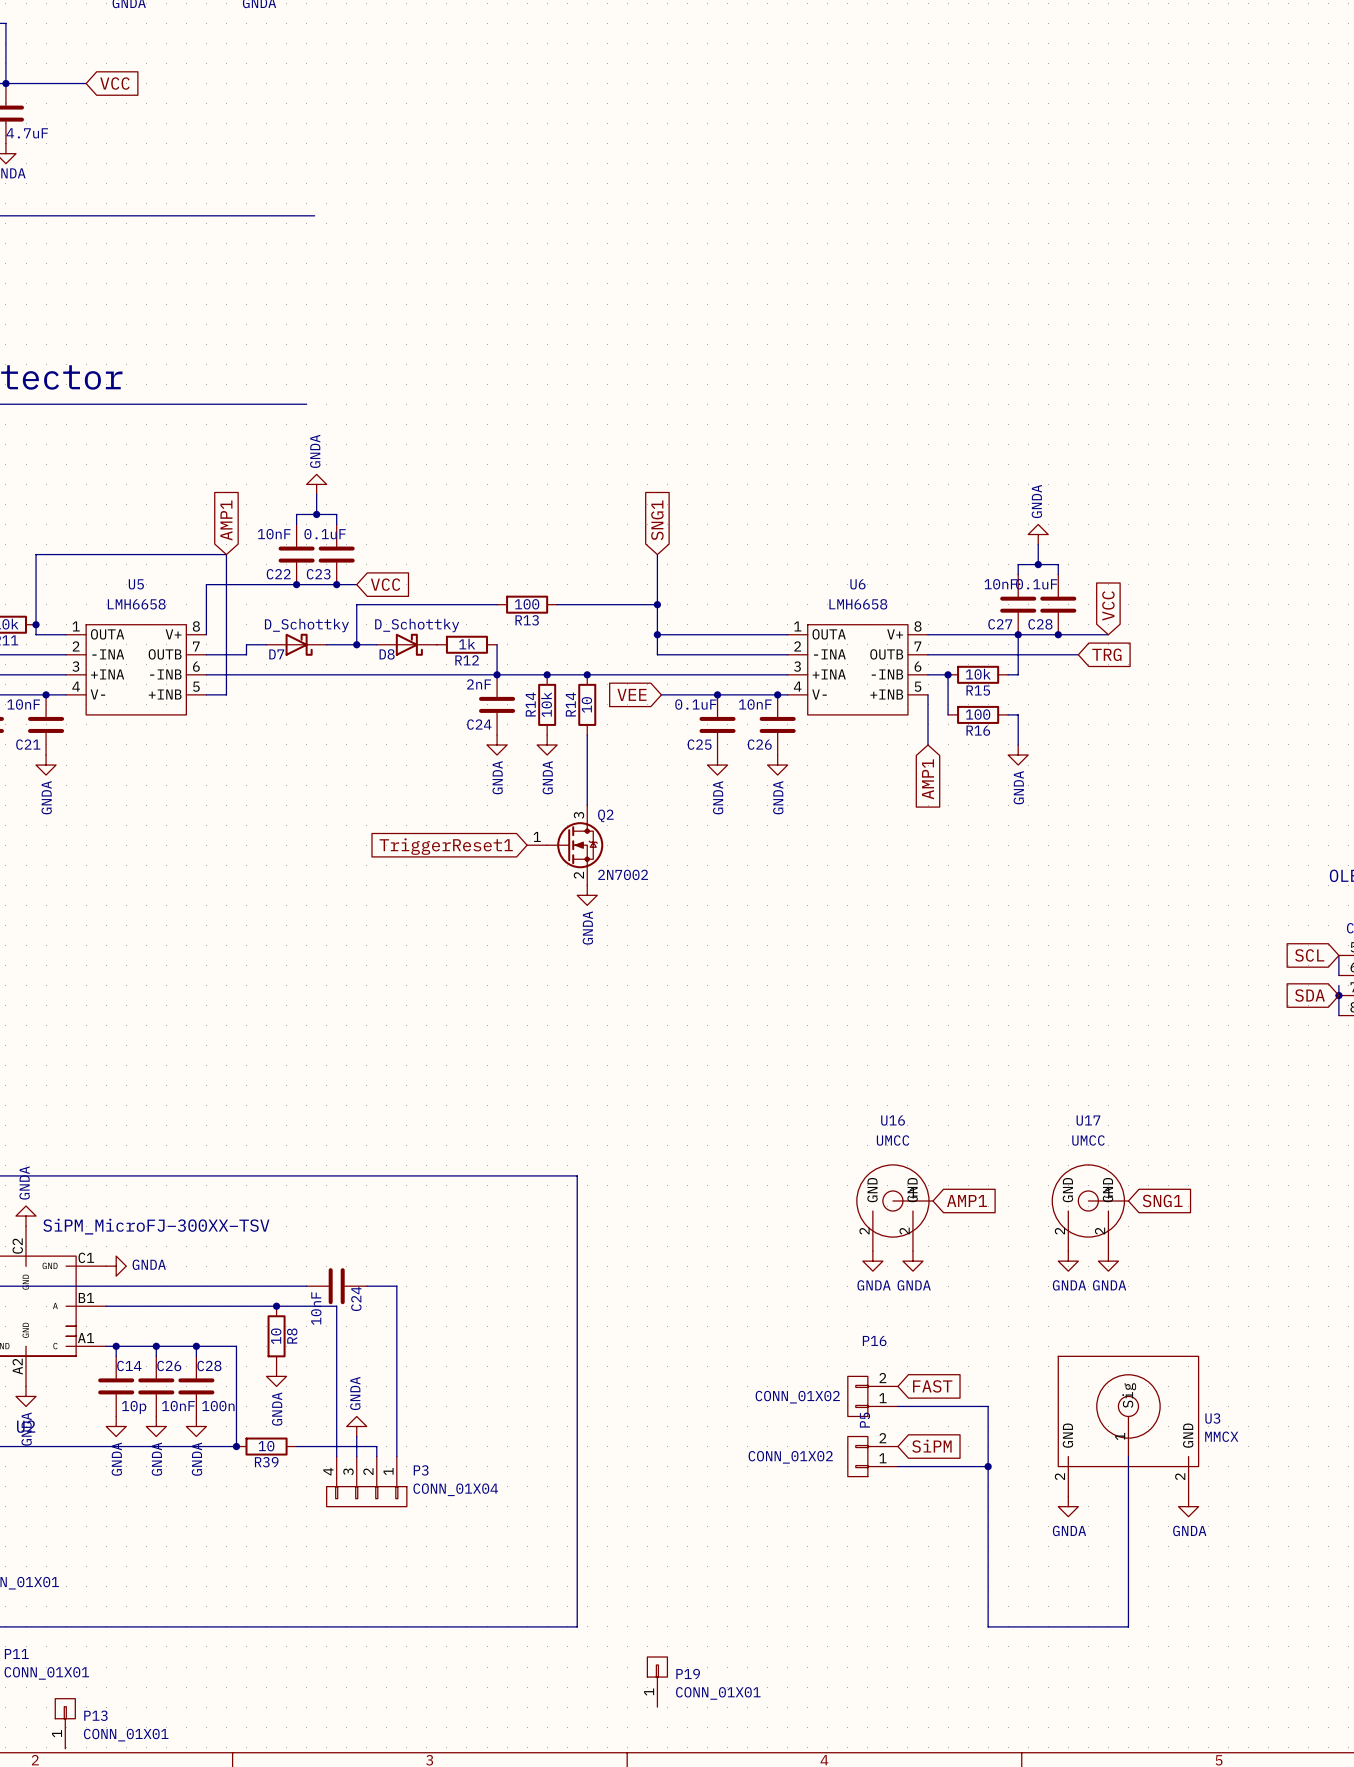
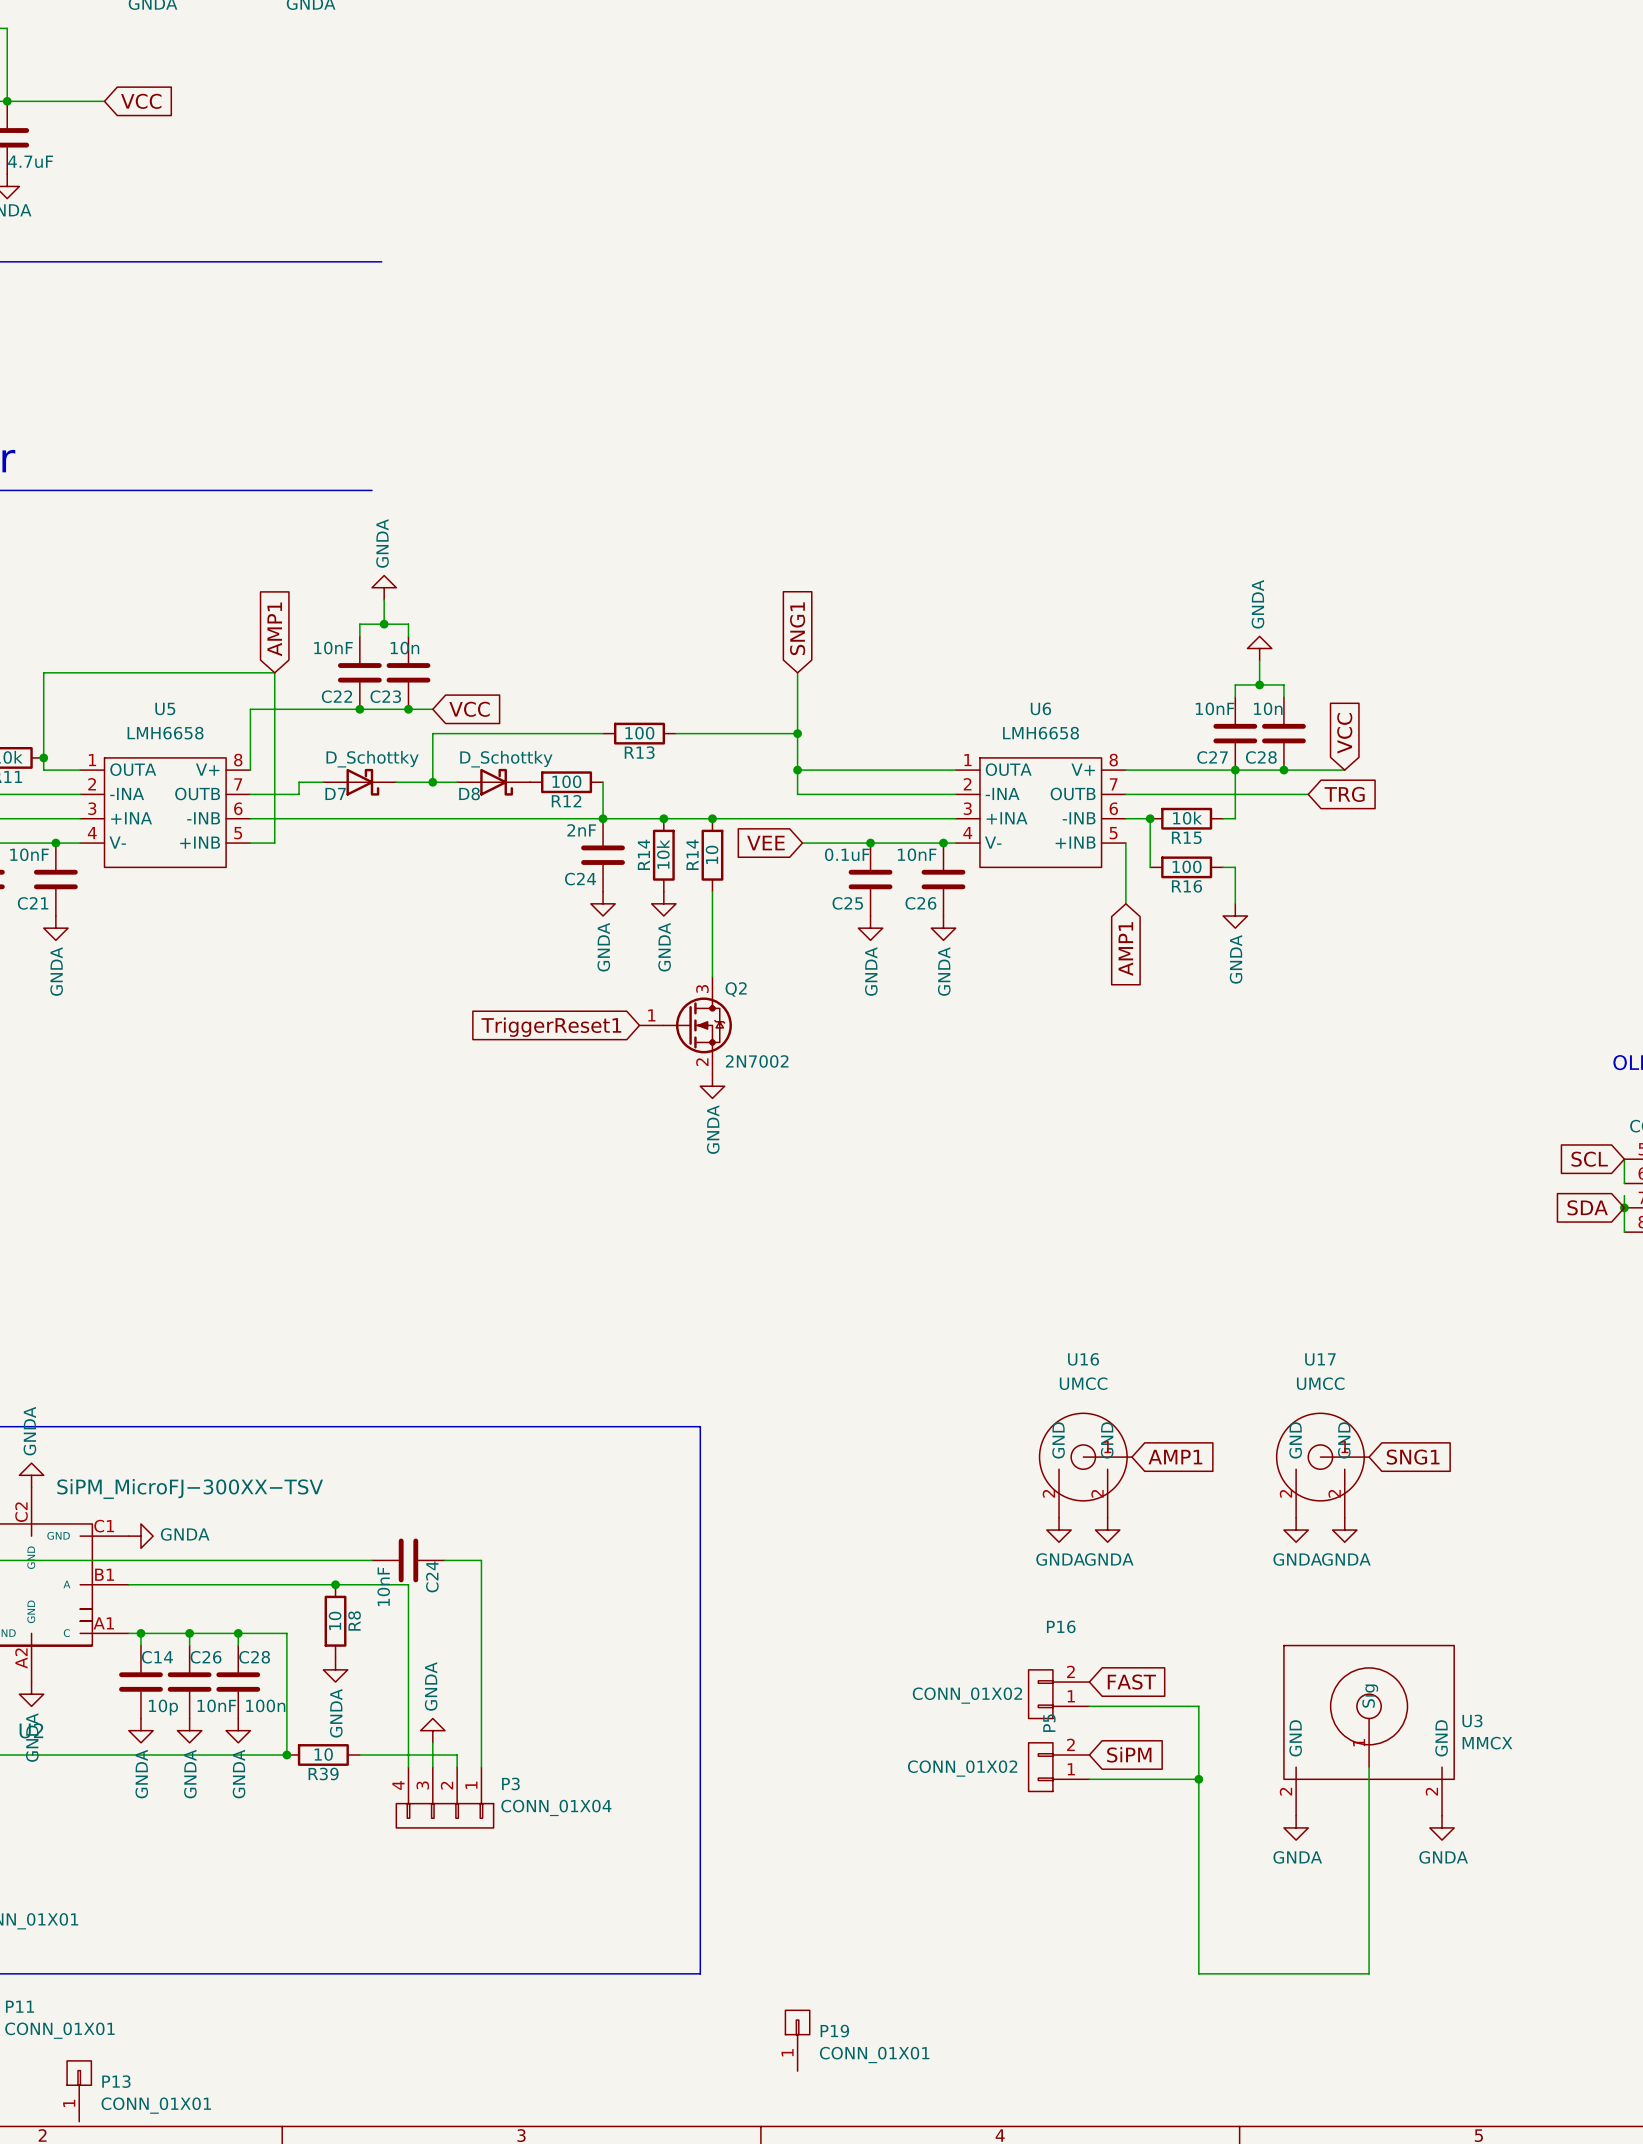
C23 value: 0.1uF (325, 534) -> 10n (404, 648)
C28 value: 0.1uF (1036, 584) -> 10n (1268, 708)
R12 value: 1k (467, 644) -> 100 (566, 781)

